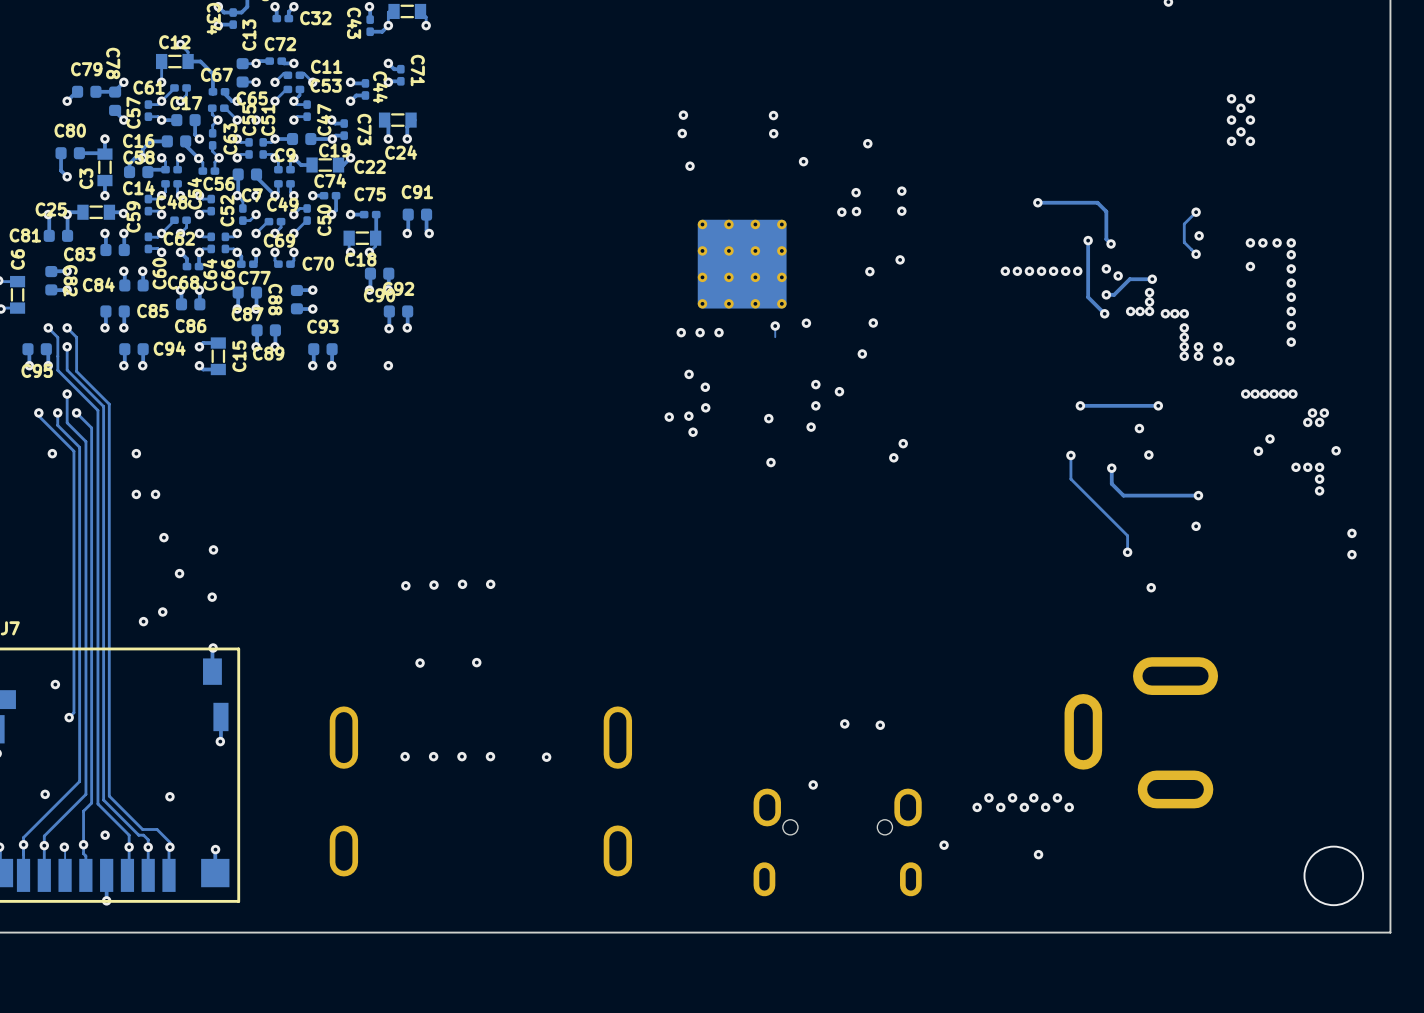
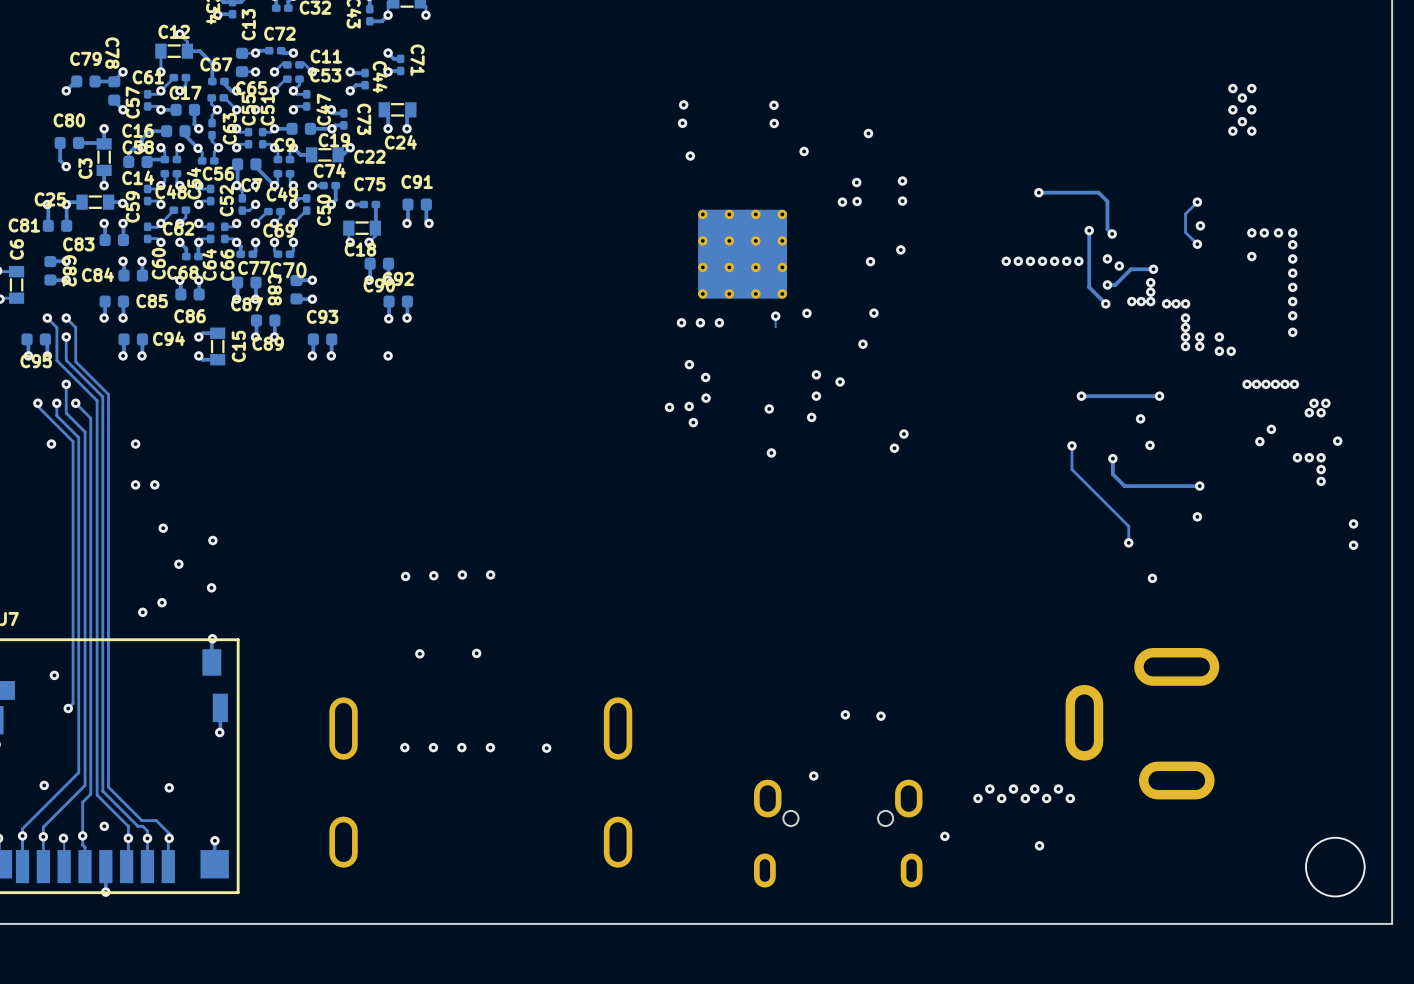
C70 name position: C70 (318, 263) -> C70 (288, 270)

